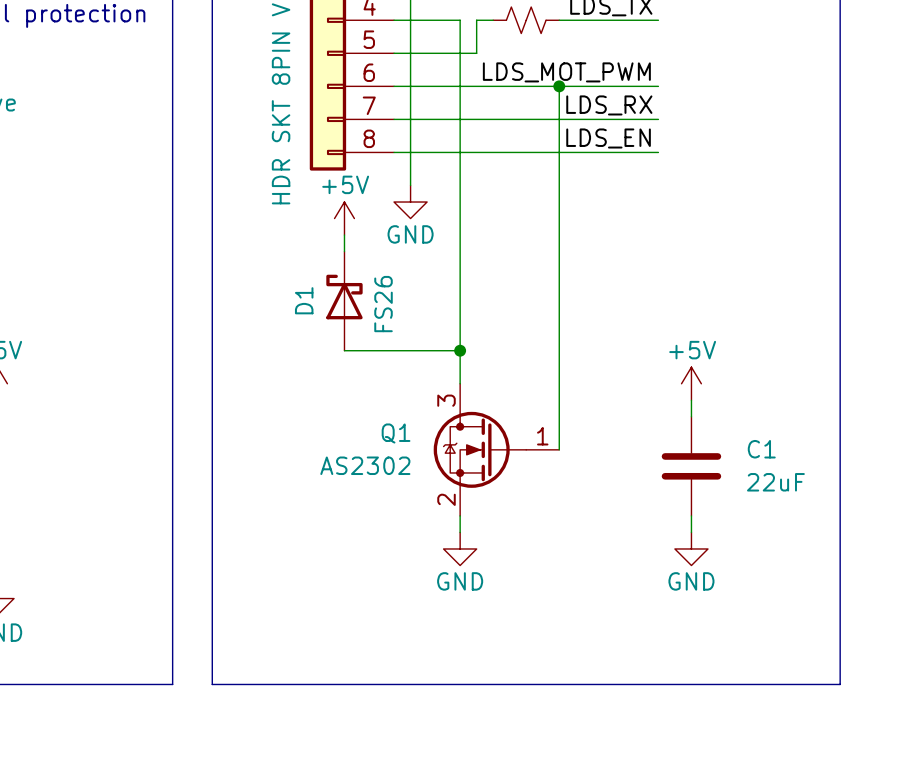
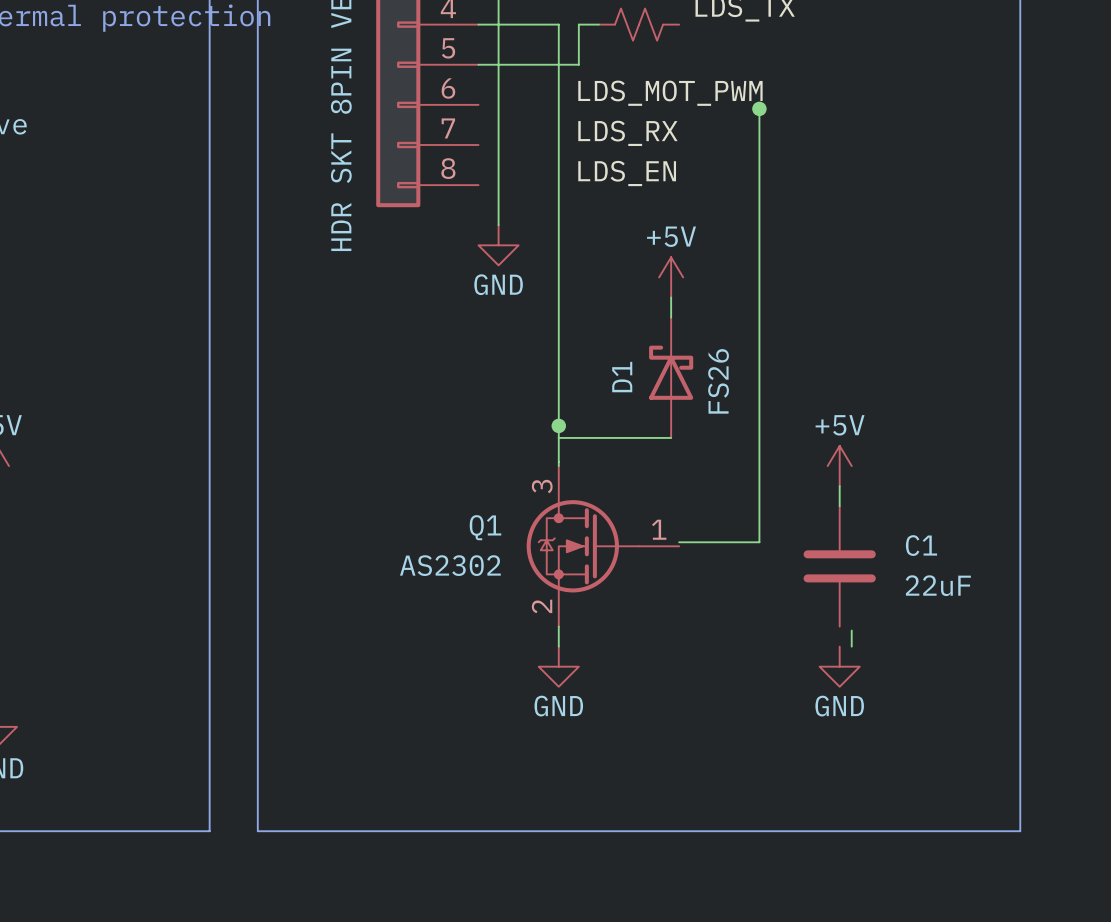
wire: (559, 20) (658, 20) -> none
label position: LDS_MOT_PWM (566, 72) -> LDS_MOT_PWM (670, 93)
wire: (394, 86) (658, 86) -> none
wire: (559, 86) (559, 449) -> none
junction position: (559, 86) -> (759, 108)
wire: none -> (759, 108) (759, 542) (679, 542)
label position: LDS_RX (609, 105) -> LDS_RX (627, 133)
wire: (394, 119) (658, 119) -> none
label position: LDS_EN (608, 138) -> LDS_EN (627, 173)
wire: (394, 152) (658, 152) -> none
power symbol: +5V (344, 218) -> none
power symbol: none -> +5V (671, 277)
wire: (344, 235) (344, 251) -> (671, 297) (671, 317)
D1 position: (344, 301) -> (671, 377)
wire: (344, 350) (460, 350) -> none
wire: none -> (558, 437) (671, 437)
wire: (691, 515) (691, 532) -> none
wire: none -> (851, 630) (851, 646)

